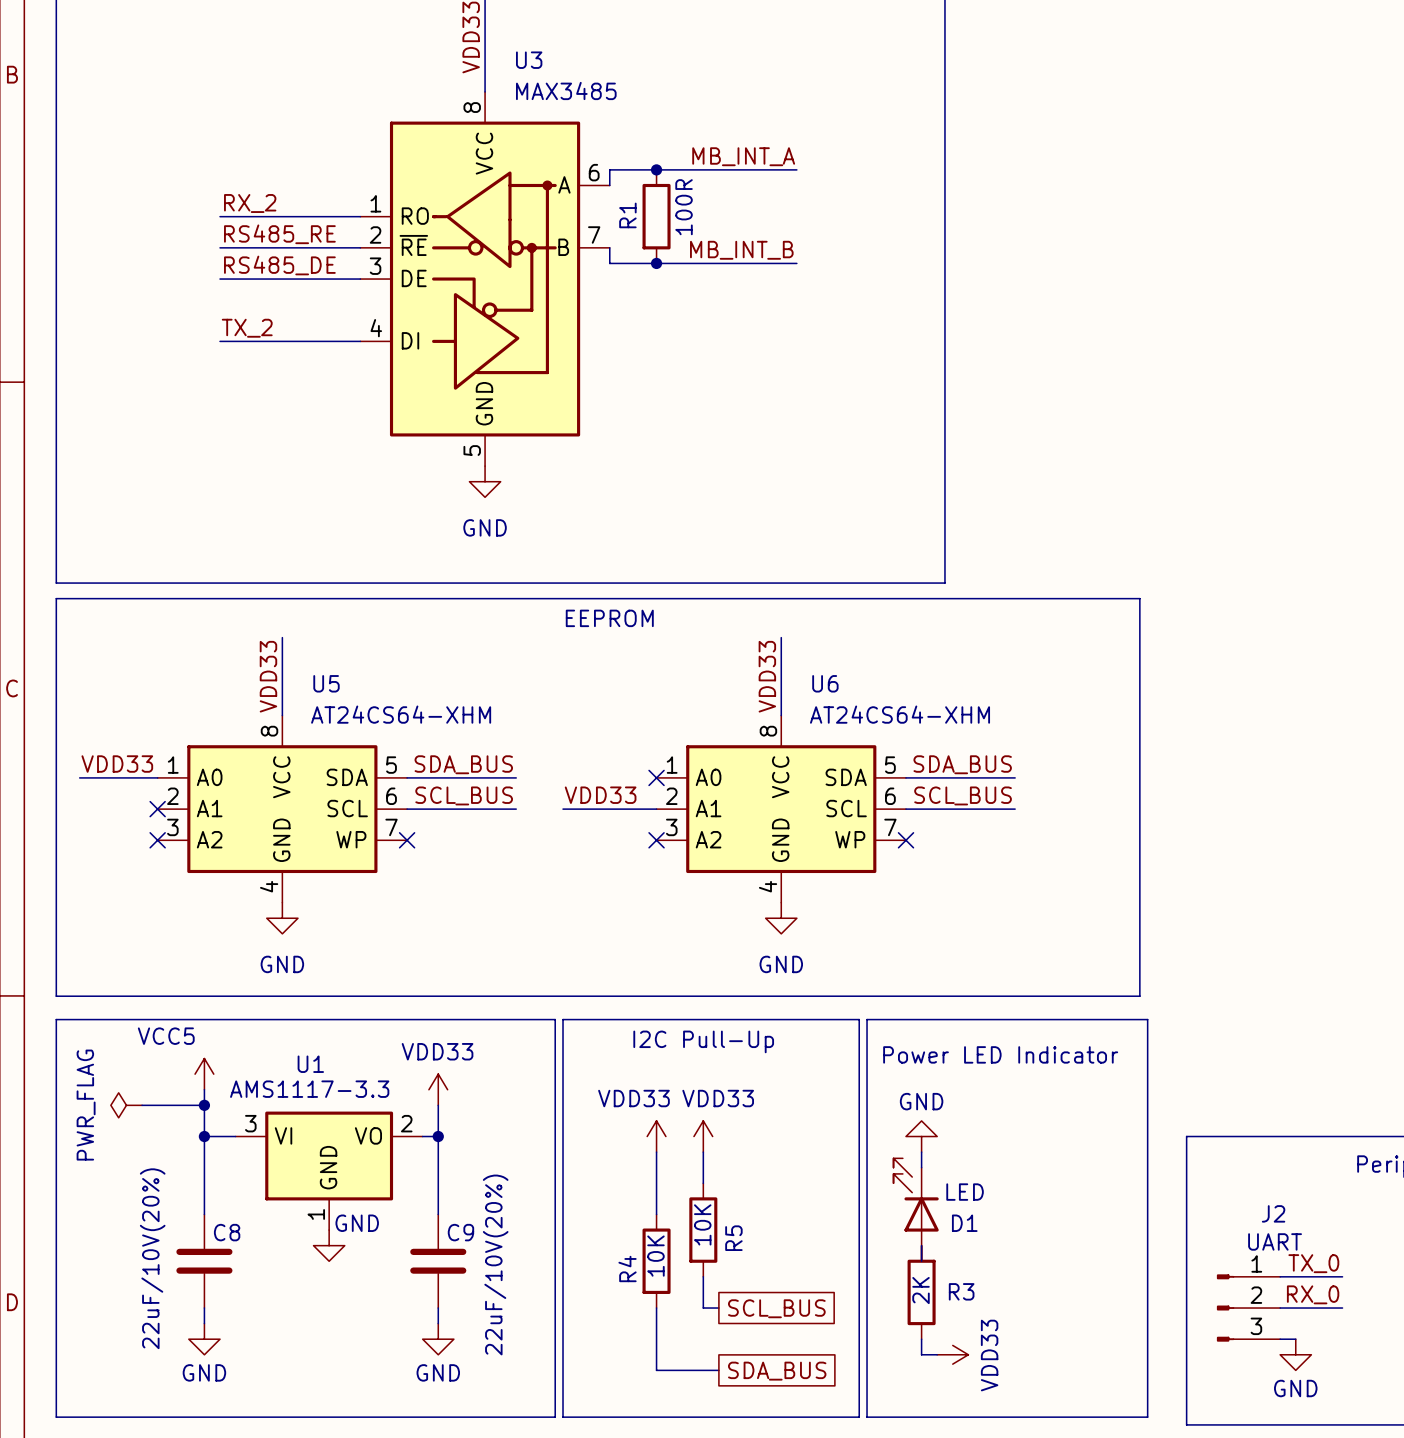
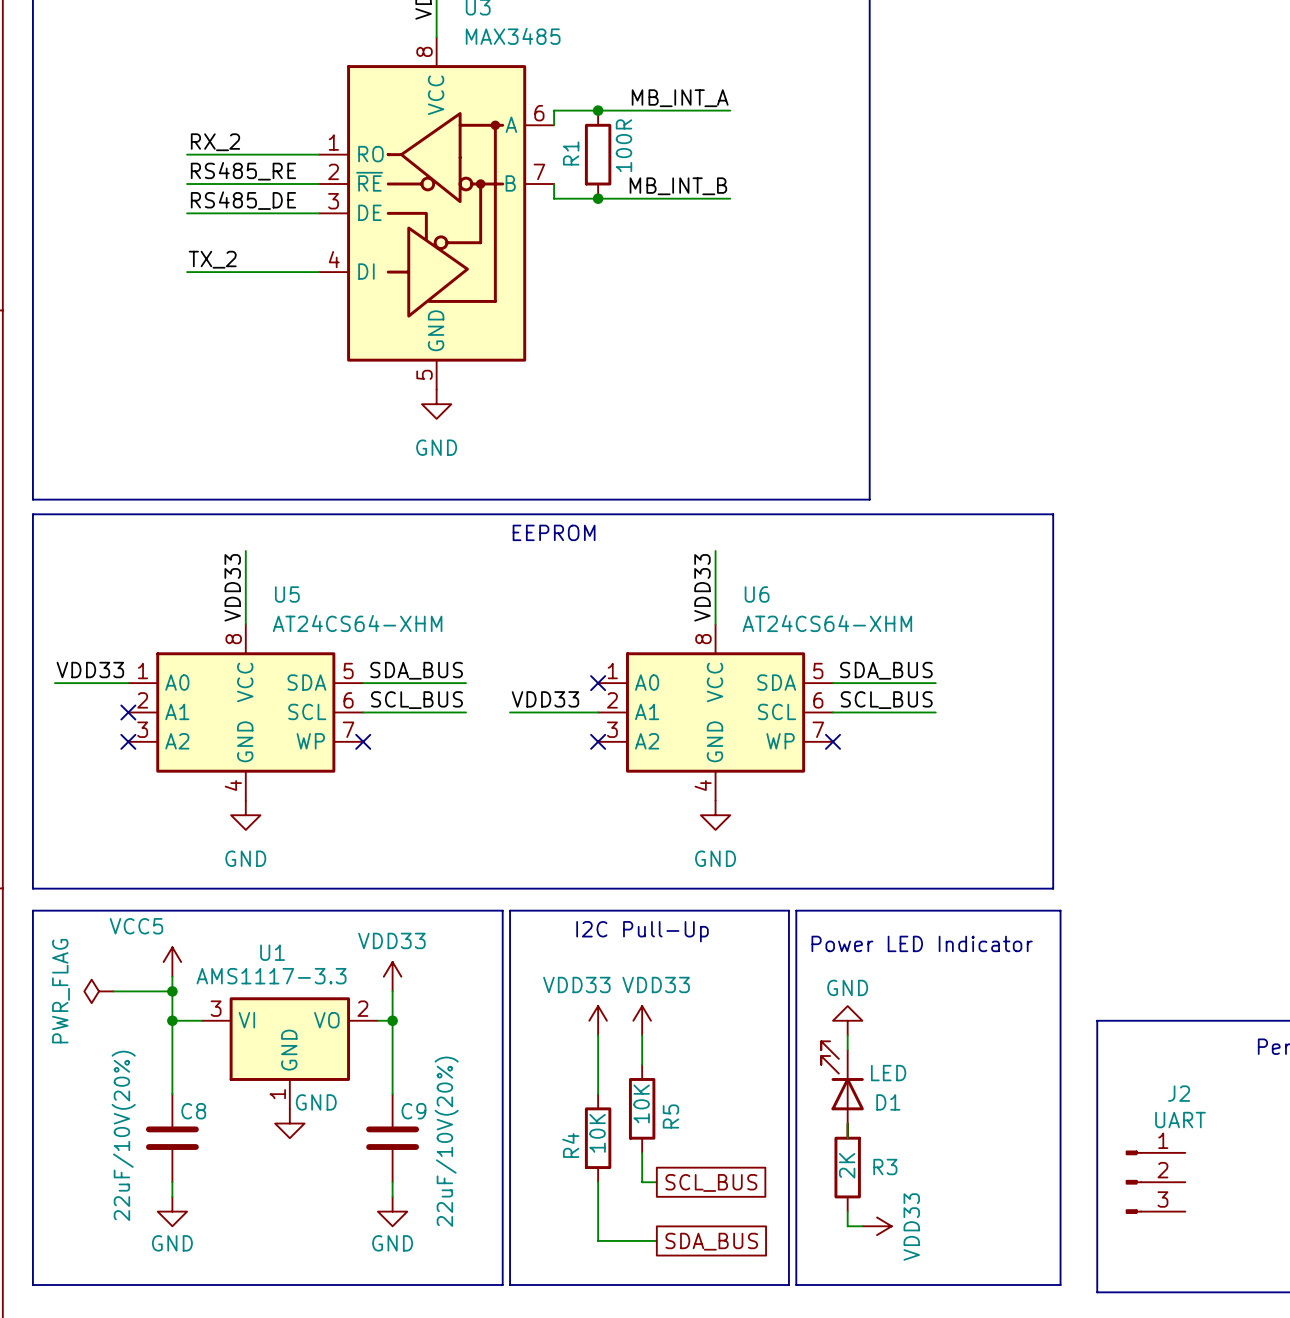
label: TX_0 (1313, 1263) -> none
wire: (1280, 1276) (1342, 1276) -> none
label: RX_0 (1313, 1294) -> none
wire: (1280, 1308) (1342, 1308) -> none
wire: (1280, 1339) (1295, 1339) -> none
power symbol: GND (1295, 1354) -> none

